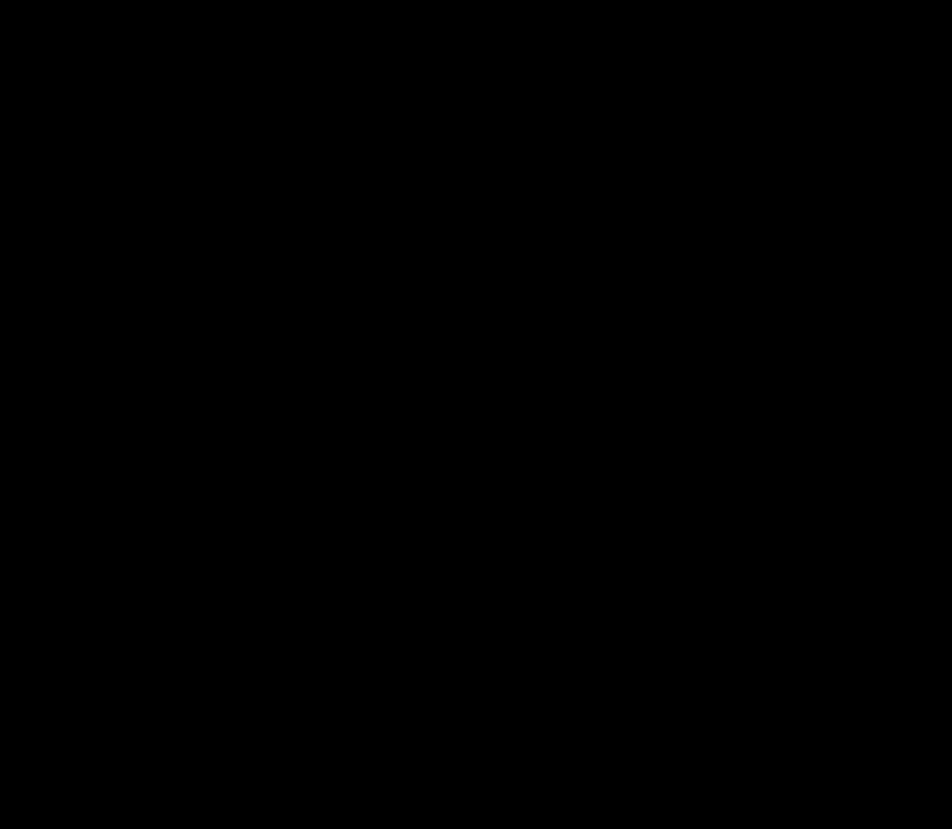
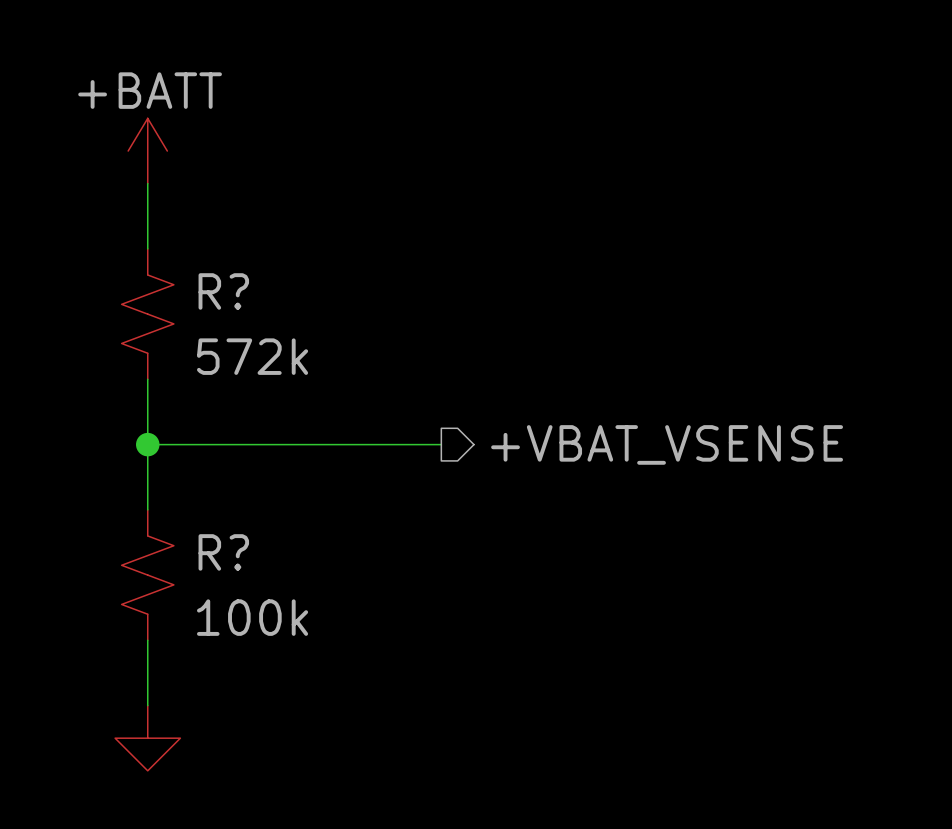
power symbol: none -> +BATT (147, 151)
wire: none -> (147, 183) (147, 248)
R?: none -> 572k (147, 314)
wire: none -> (147, 379) (147, 509)
wire: none -> (147, 444) (441, 444)
junction: none -> (147, 444)
hierarchical label: none -> +VBAT_VSENSE (667, 444)
R?: none -> 100k (147, 575)
wire: none -> (147, 640) (147, 705)
power symbol: none -> (147, 738)

